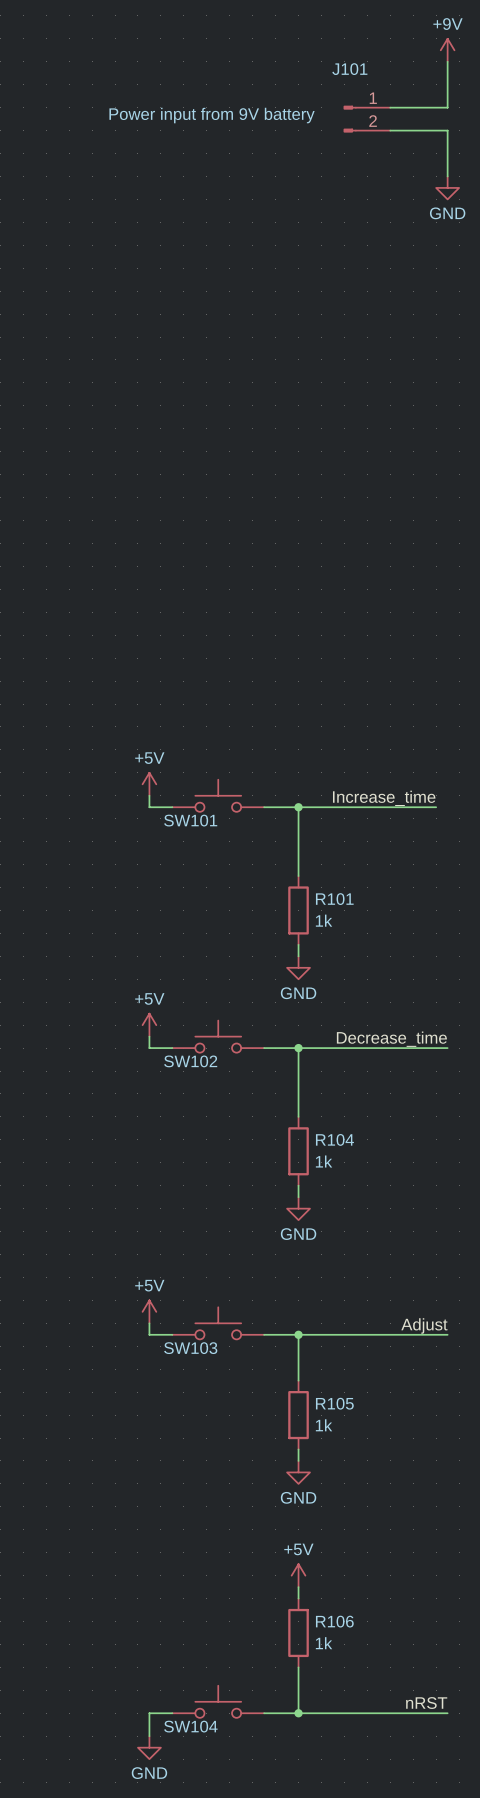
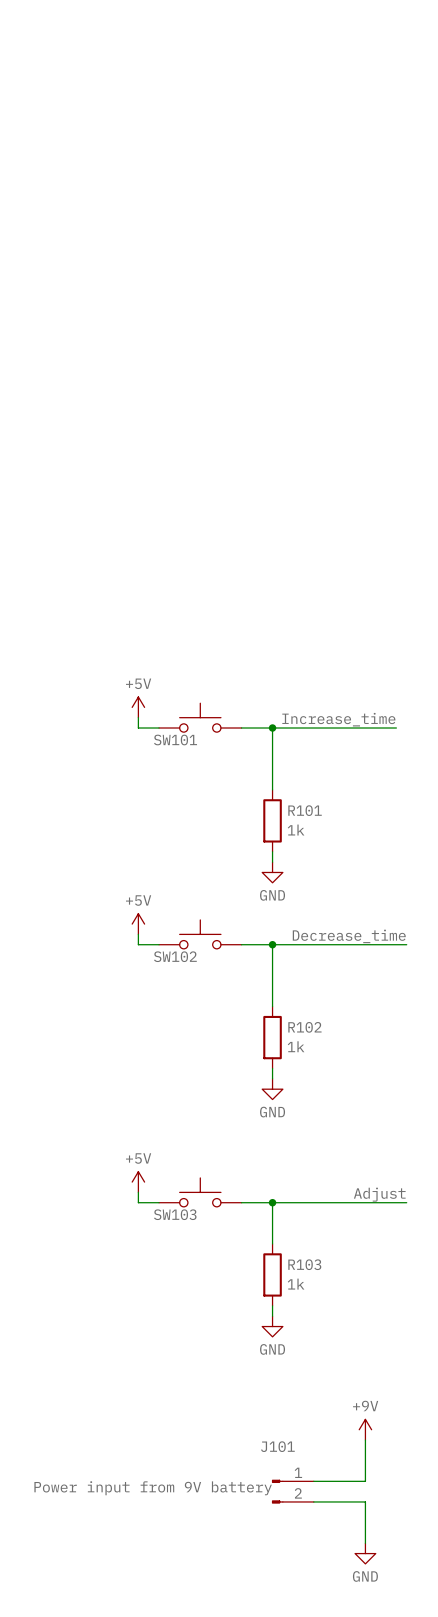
power symbol: +9V (447, 50) -> none
wire: (447, 61) (447, 107) (390, 107) -> none
J101 position: (367, 119) -> (292, 1491)
wire: (390, 130) (447, 130) (447, 176) -> none
power symbol: GND (447, 187) -> none
R104 name: R104 (334, 1139) -> R102 (304, 1027)
R105 name: R105 (334, 1403) -> R103 (304, 1264)
power symbol: +5V (298, 1575) -> none
wire: (298, 1587) (298, 1598) -> none
power symbol: none -> +9V (365, 1429)
wire: none -> (365, 1440) (365, 1481) (313, 1481)
R106: 1k (298, 1632) -> none
wire: (298, 1667) (298, 1713) -> none
wire: none -> (313, 1501) (365, 1501) (365, 1543)
SW104: (218, 1701) -> none
label: nRST (426, 1703) -> none
wire: (172, 1713) (149, 1713) (149, 1736) -> none
wire: (264, 1713) (447, 1713) -> none
junction: (298, 1713) -> none
power symbol: none -> GND (365, 1553)
power symbol: GND (149, 1747) -> none

